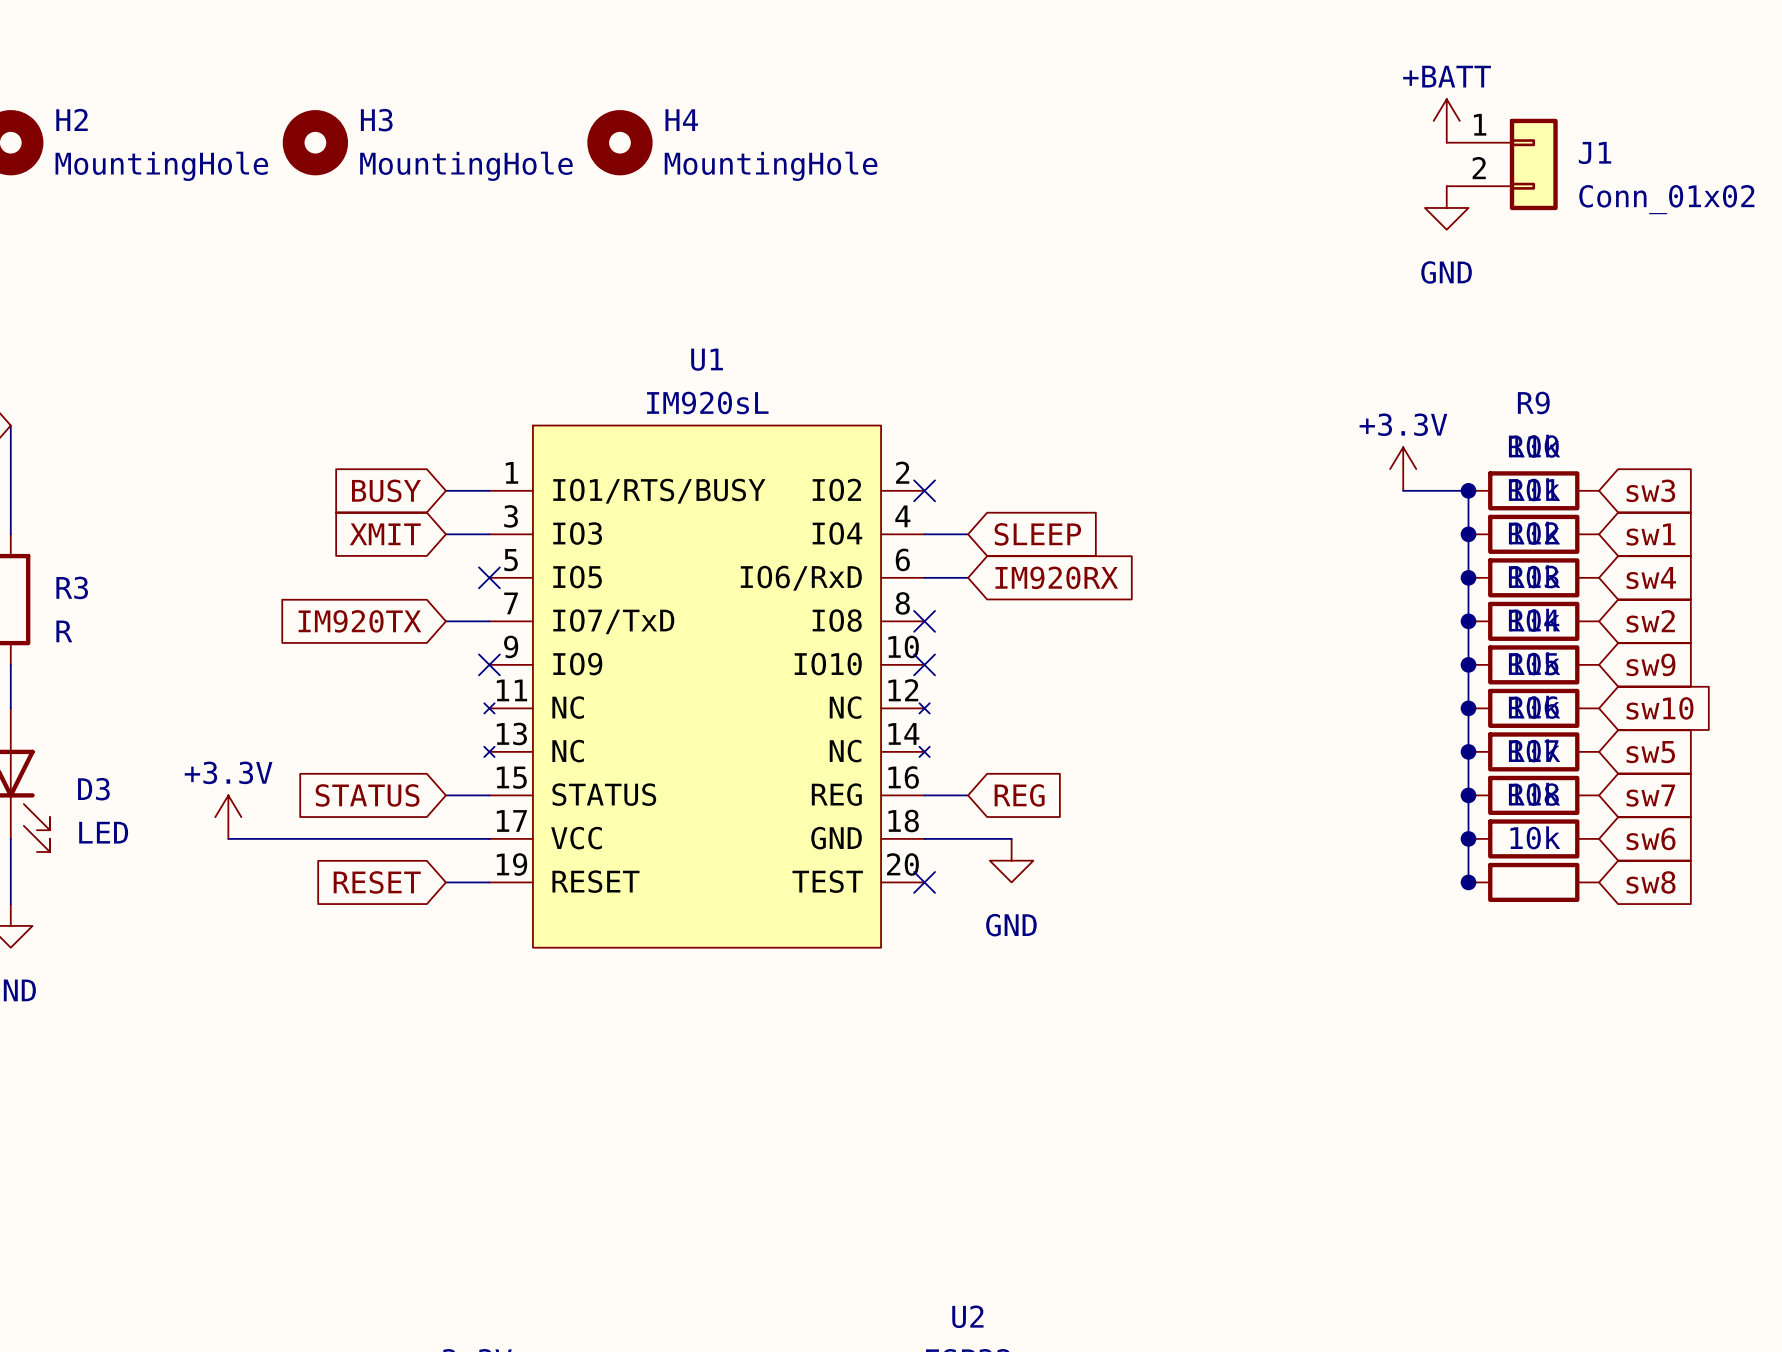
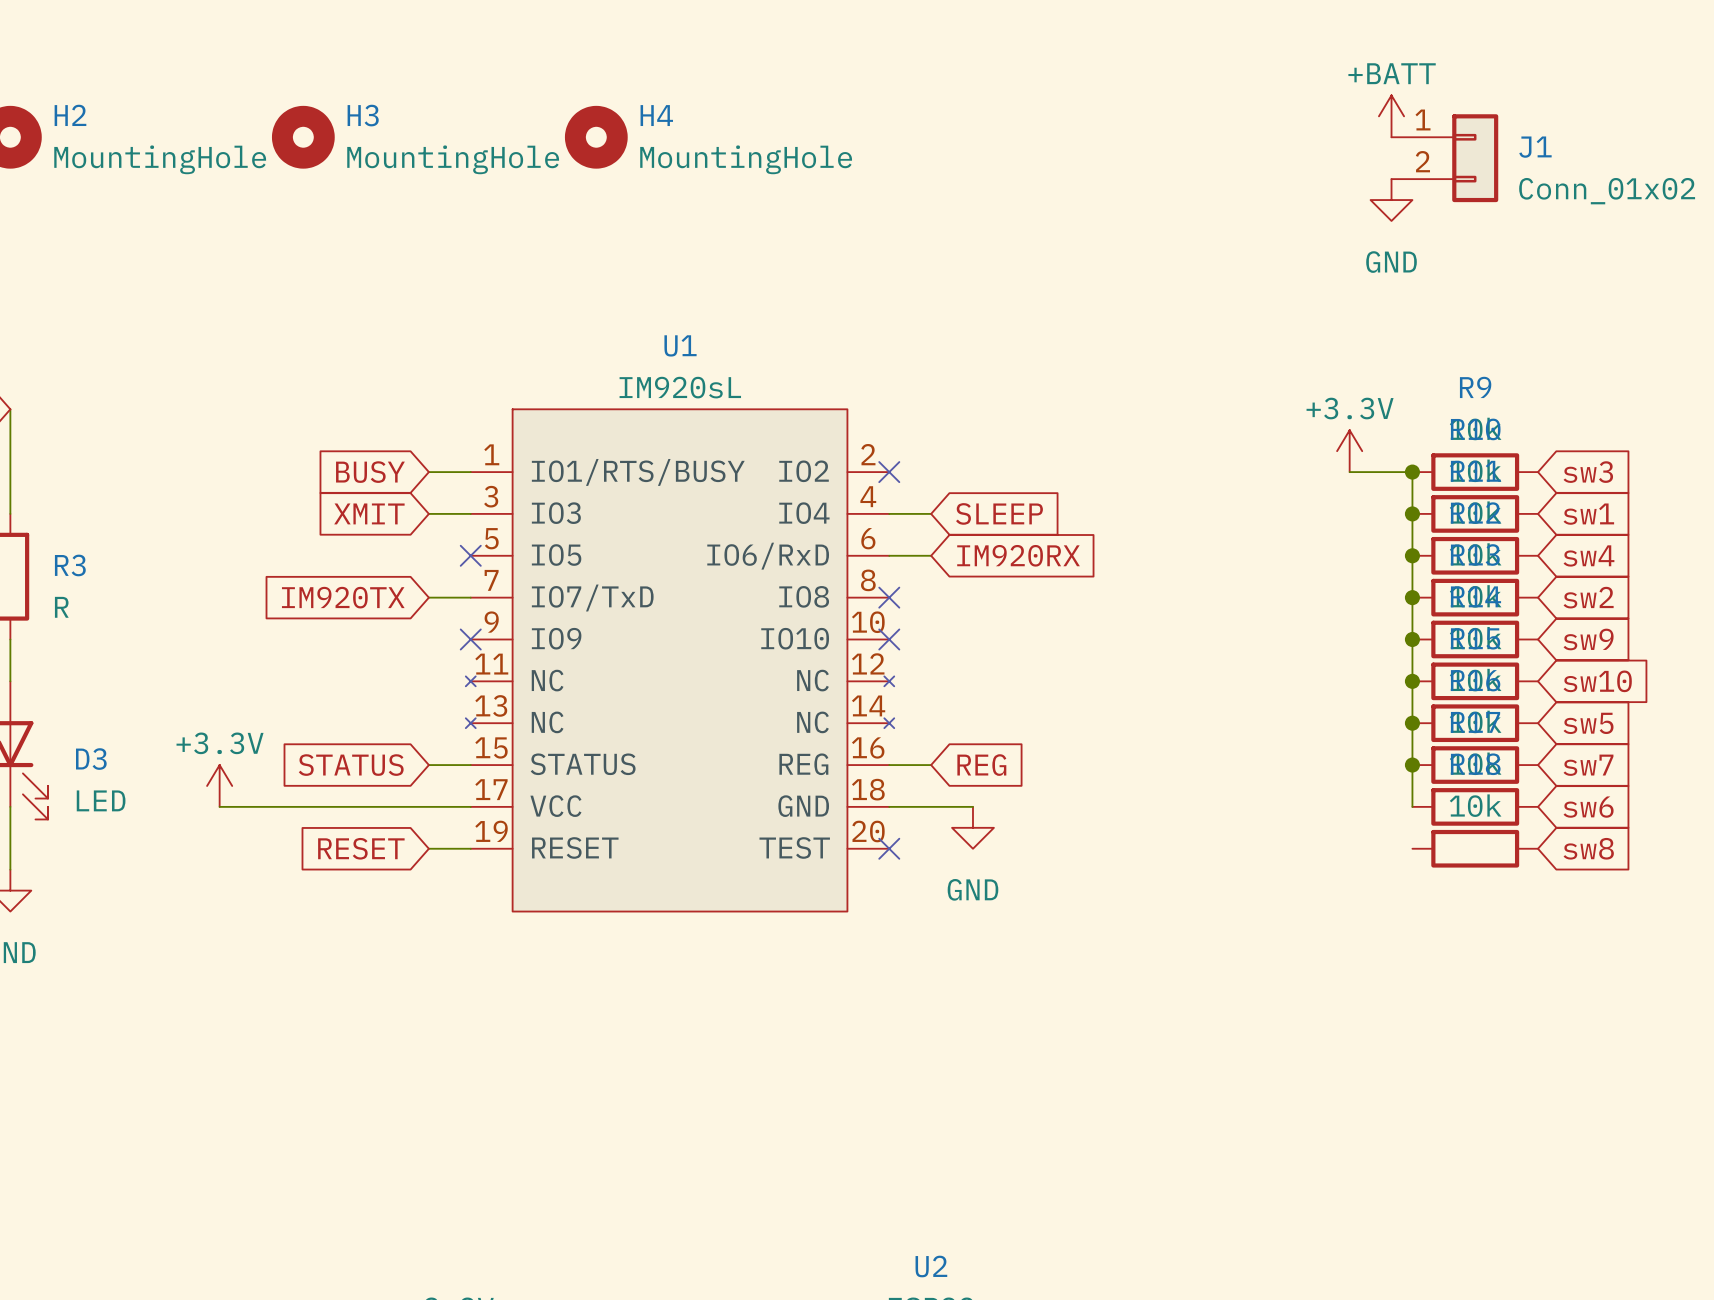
wire: (1468, 838) (1468, 882) -> none
junction: (1468, 838) -> none
junction: (1468, 882) -> none

